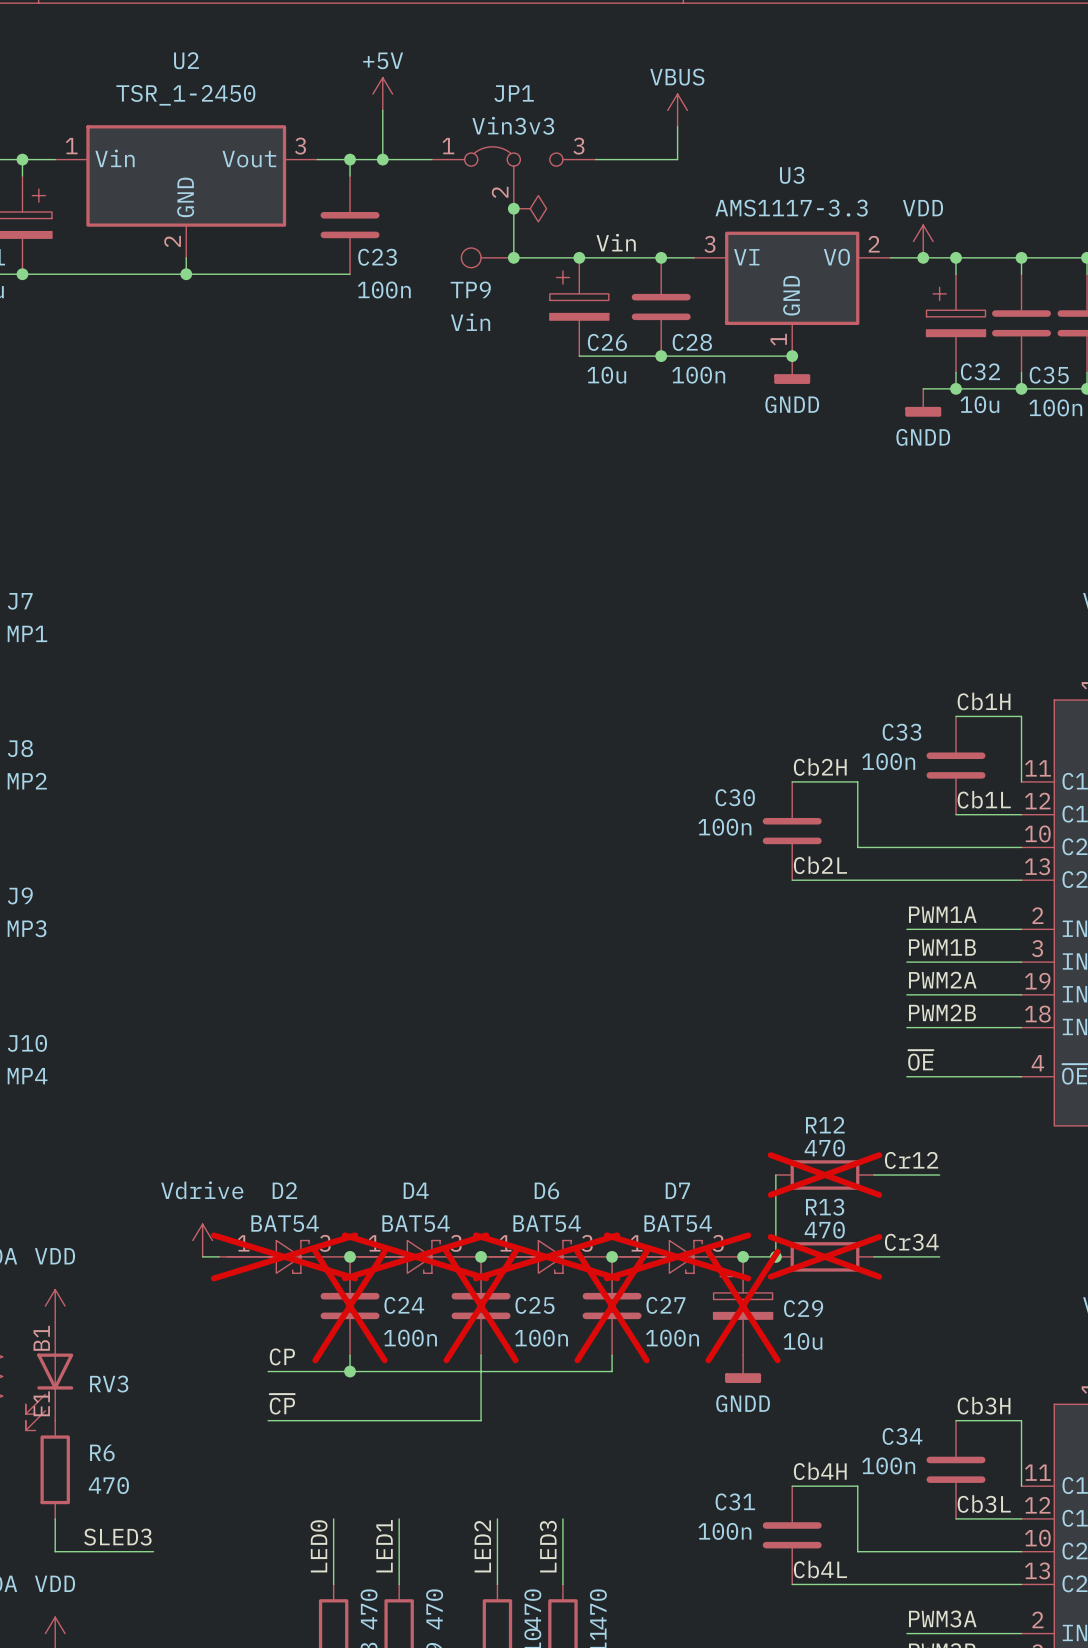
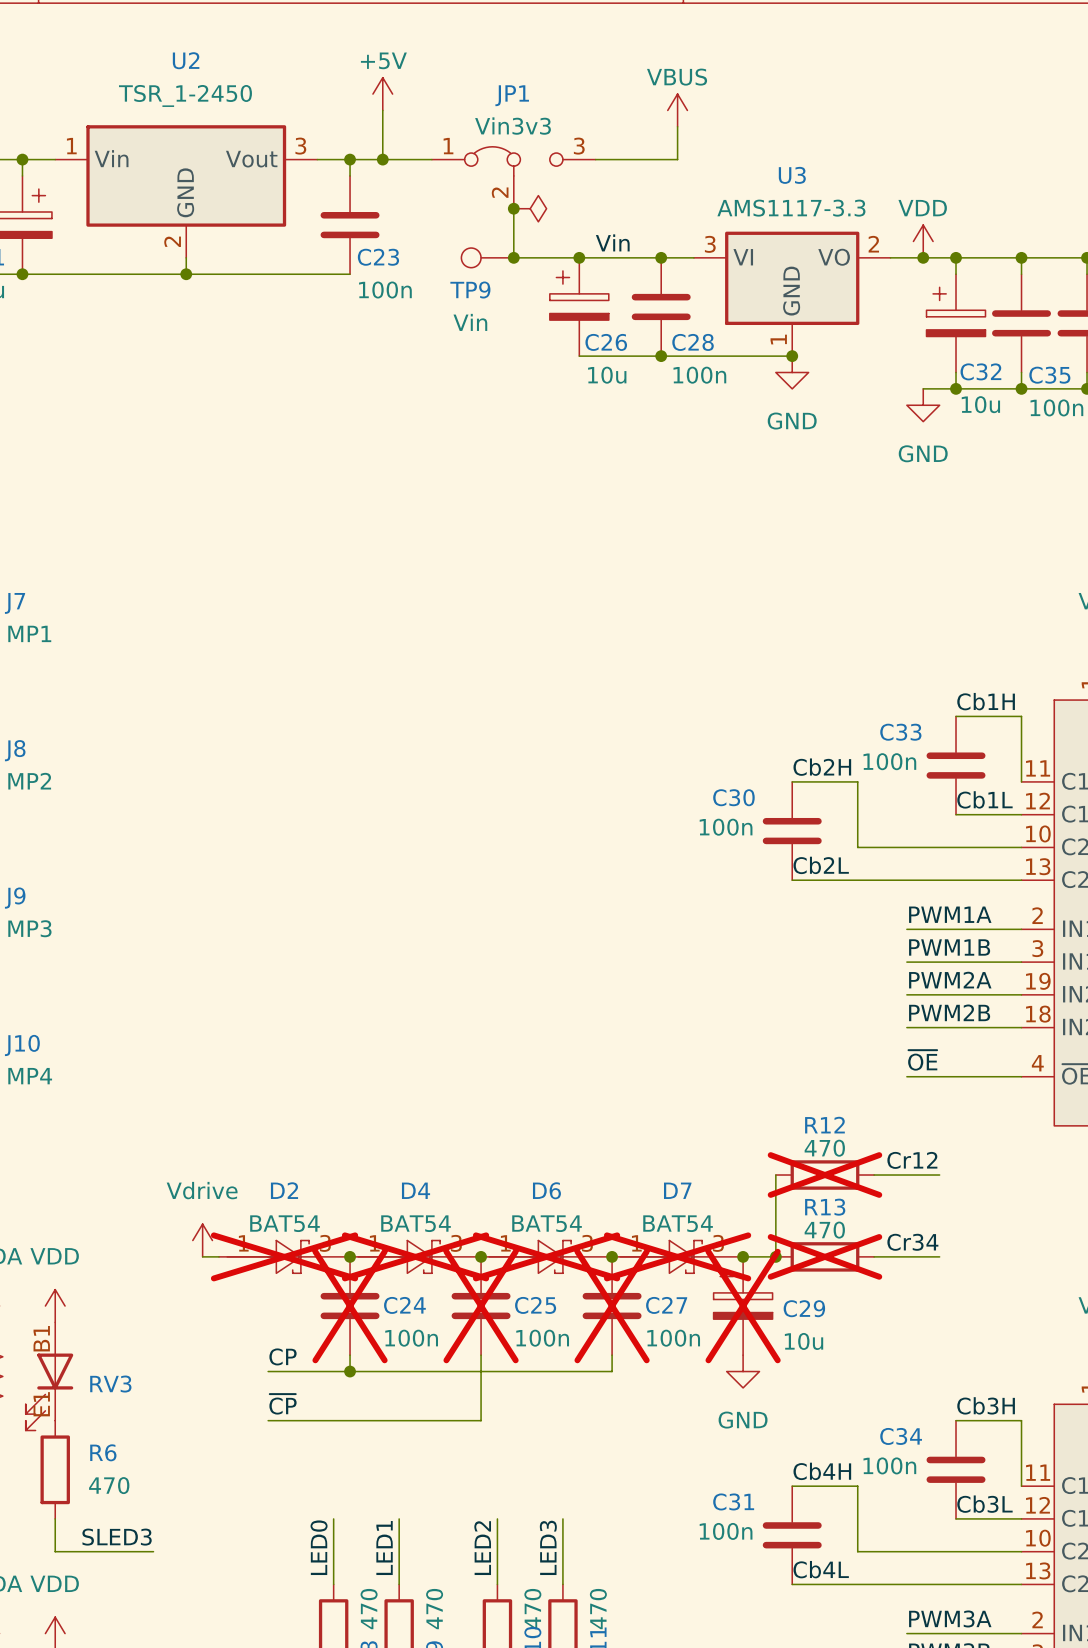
power symbol: GNDD (792, 370) -> GND (792, 372)
power symbol: GNDD (923, 402) -> GND (923, 405)
power symbol: GNDD (743, 1369) -> GND (743, 1371)

